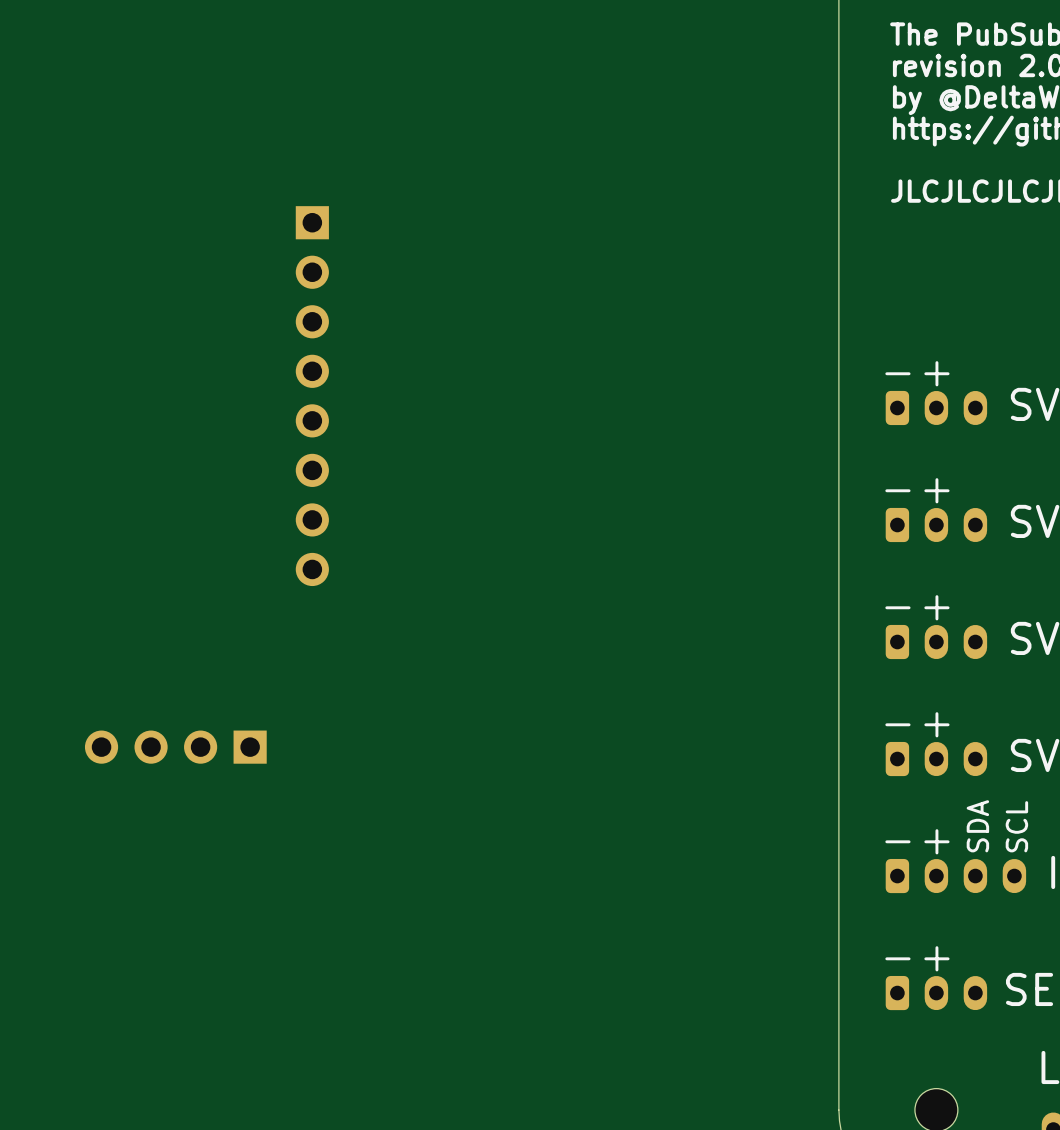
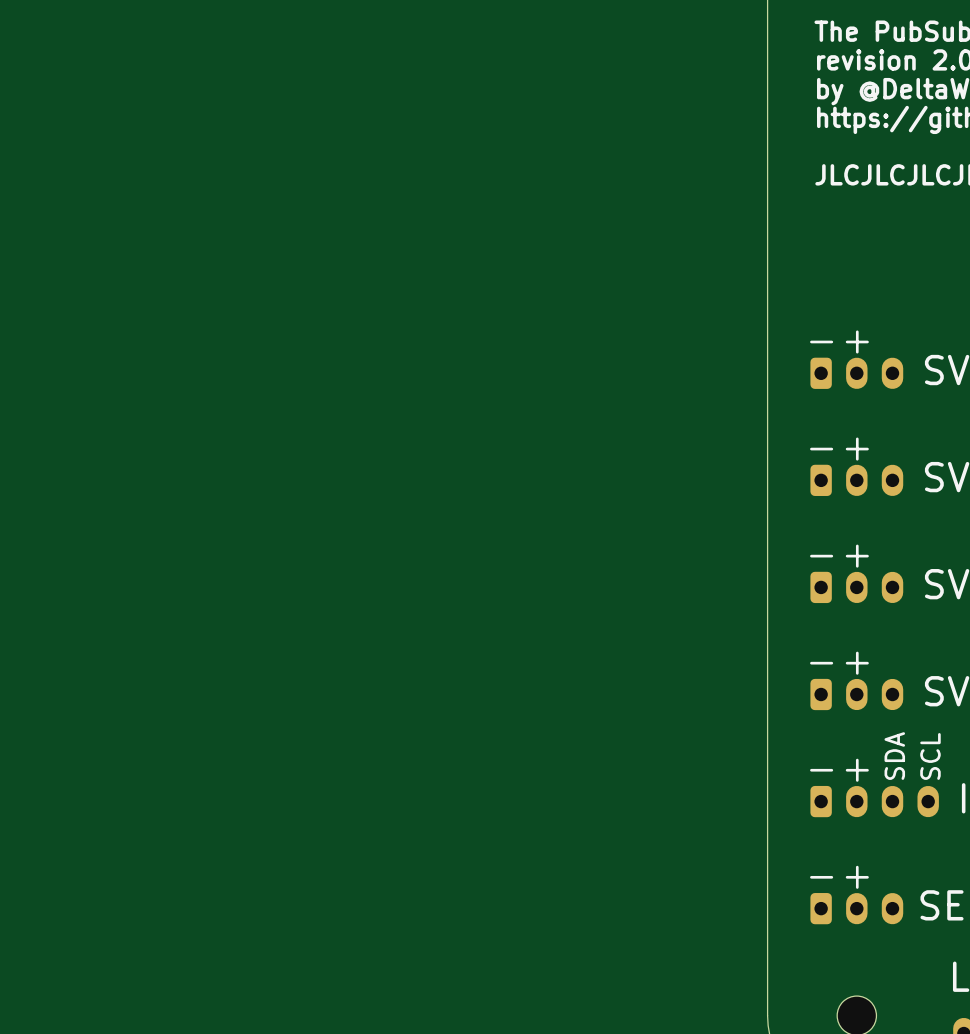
part: (312, 396) -> none
part: (175, 747) -> none

